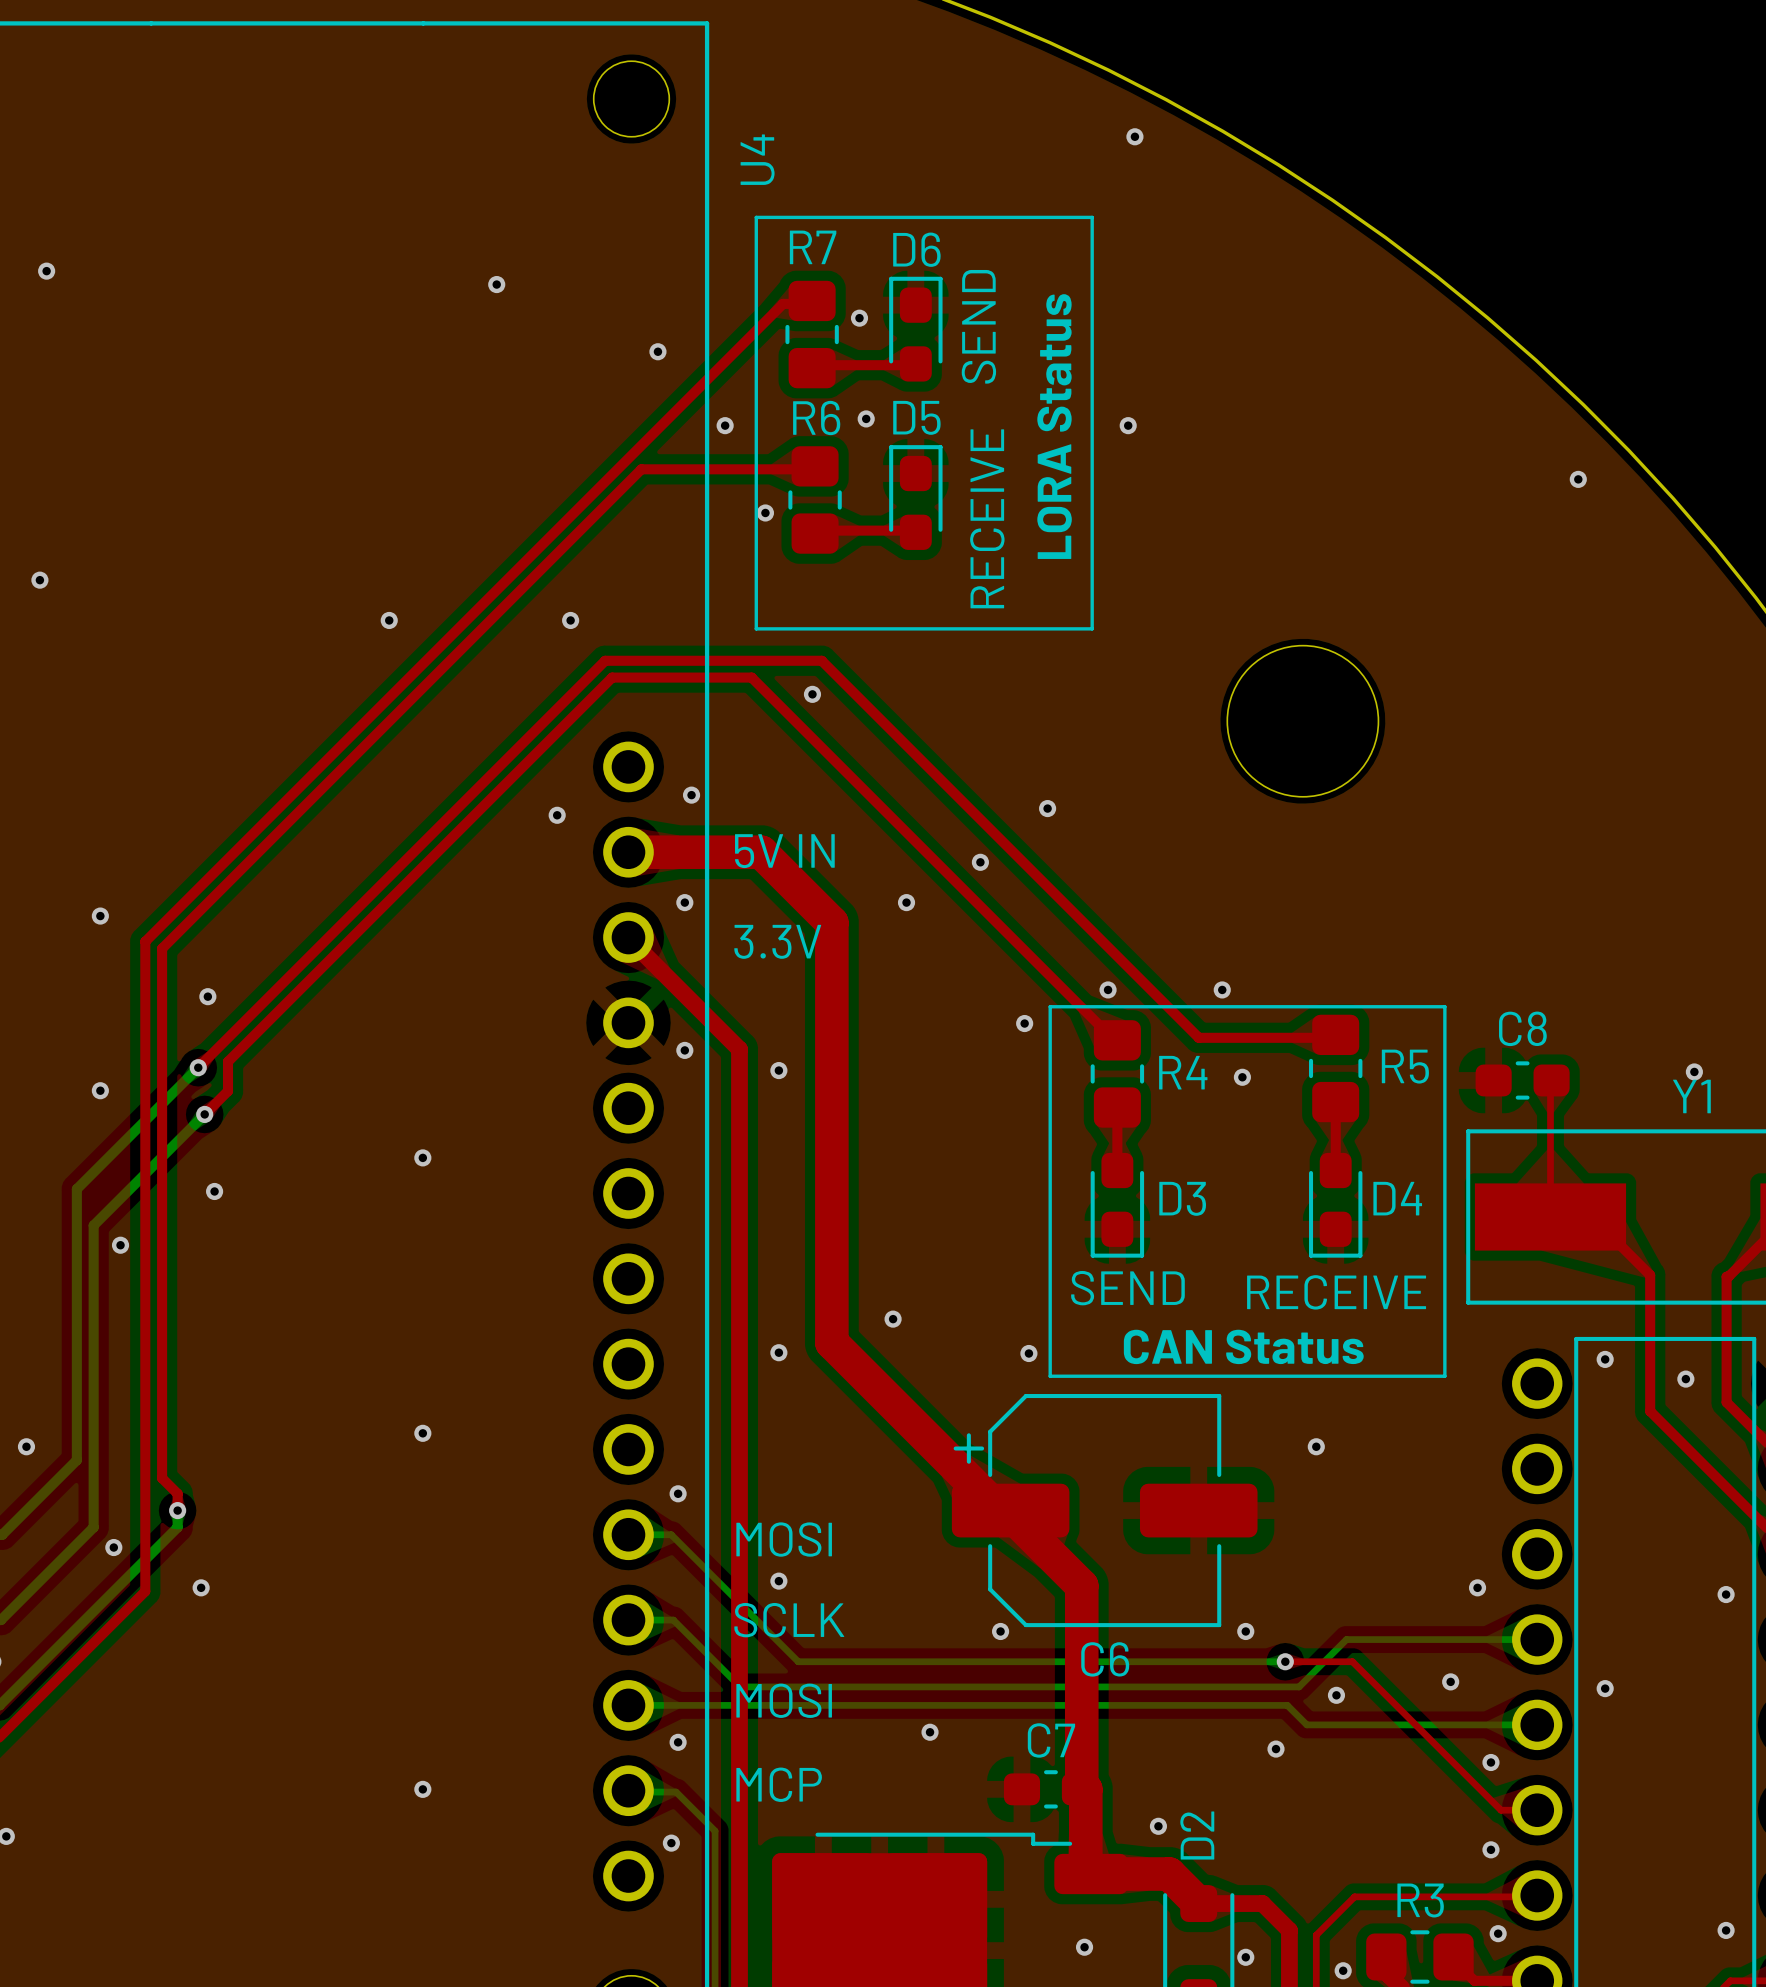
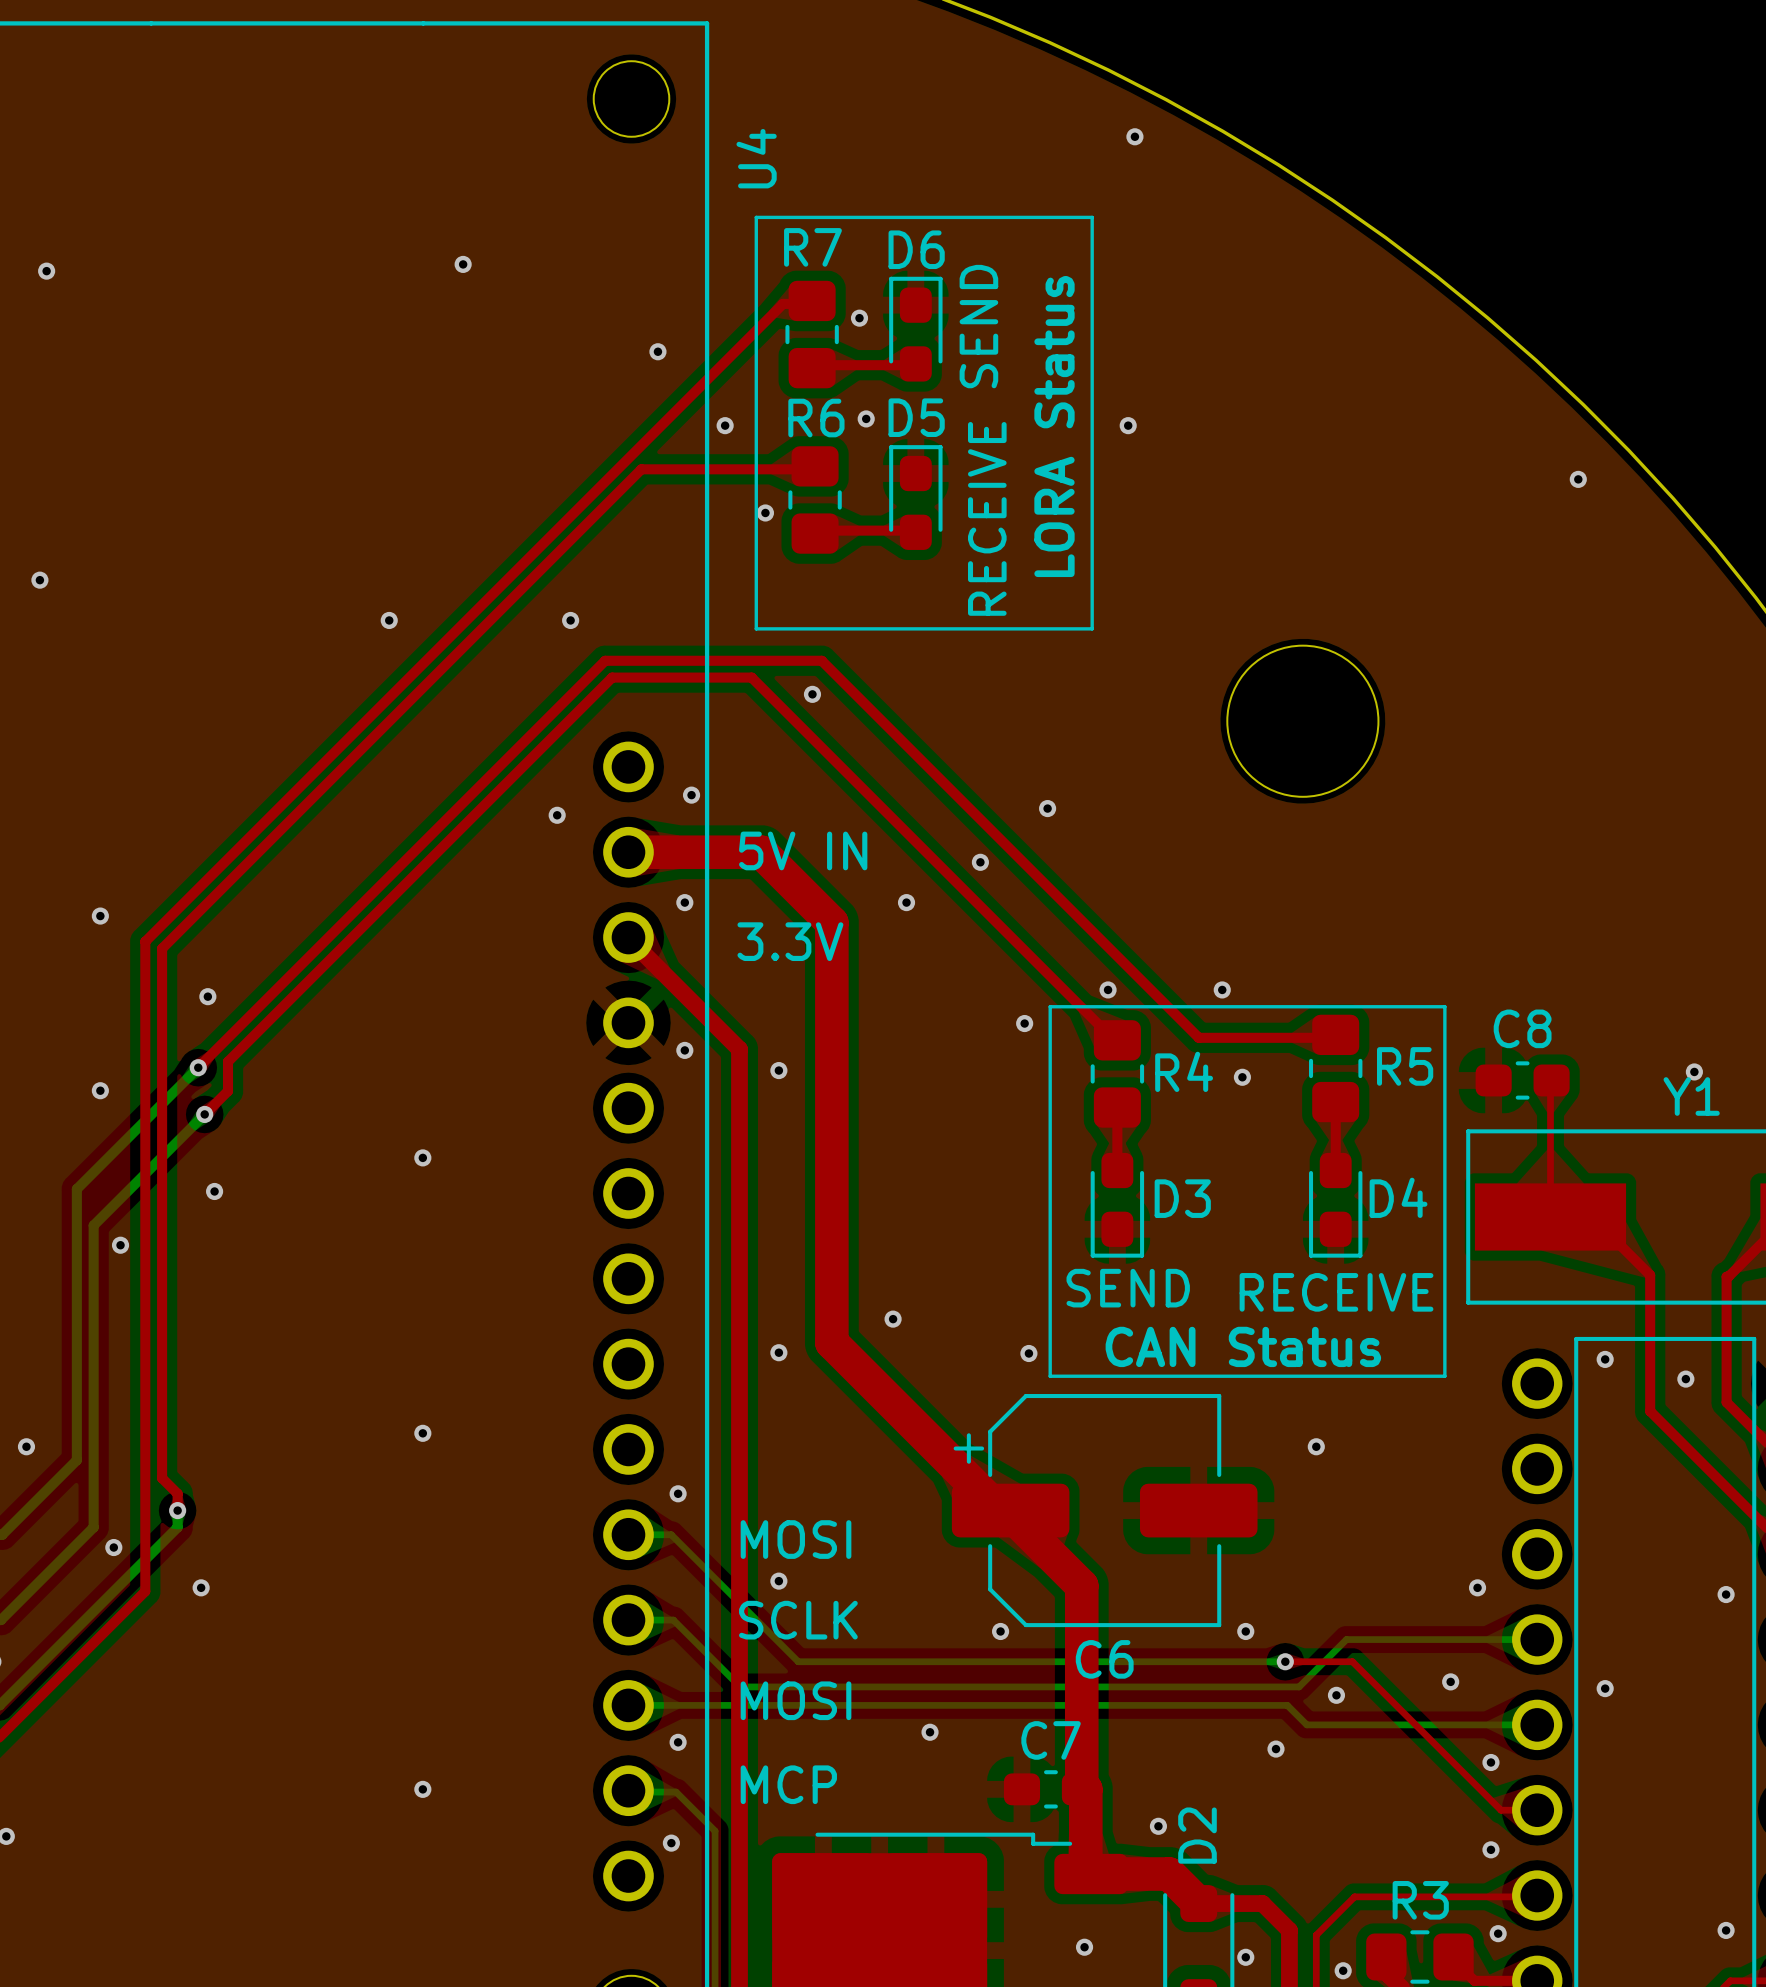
via position: (496, 284) -> (463, 264)

